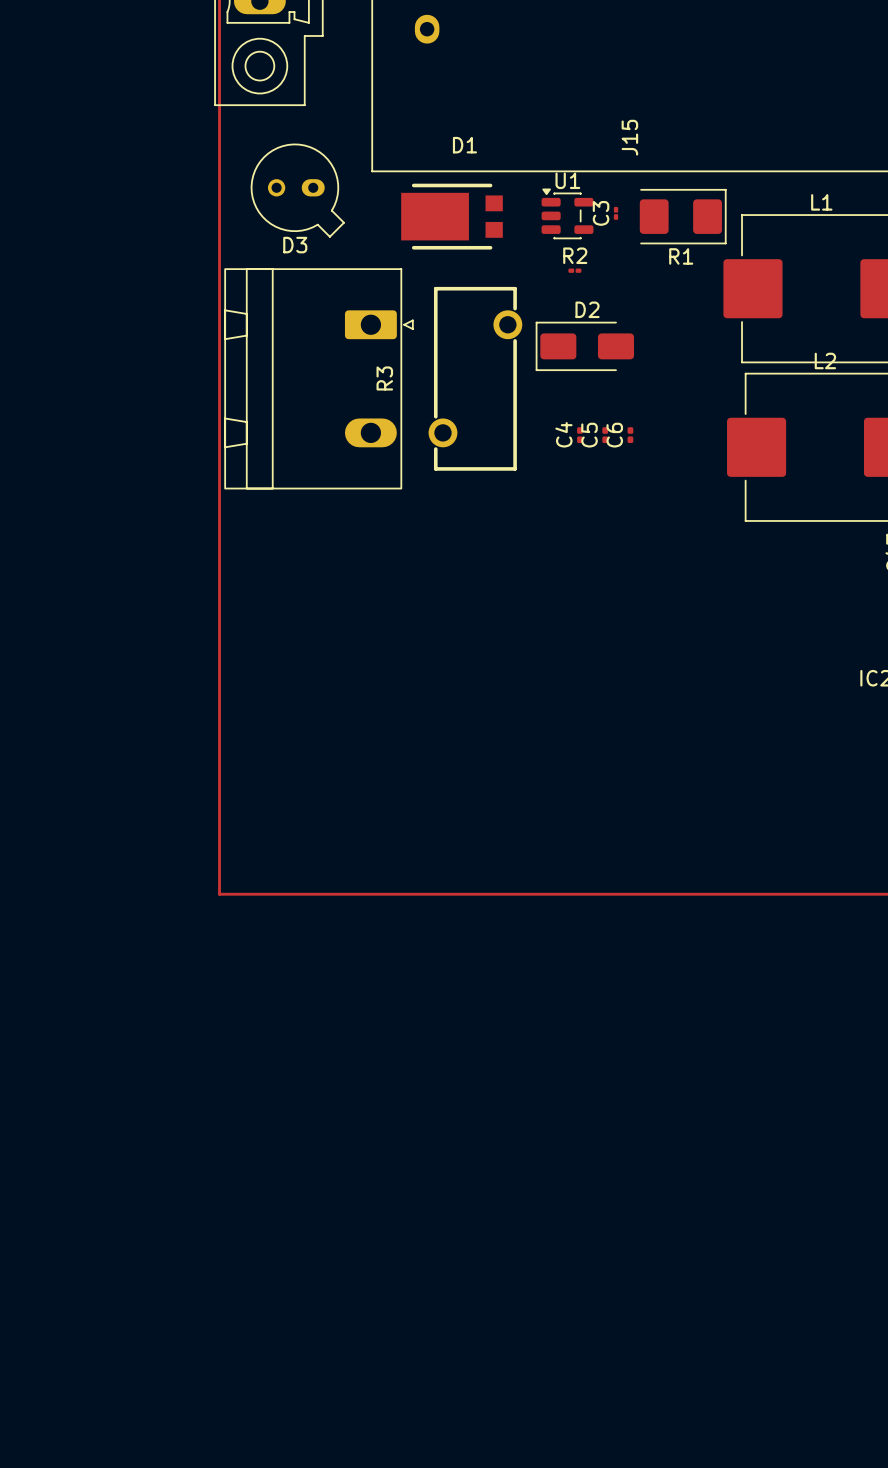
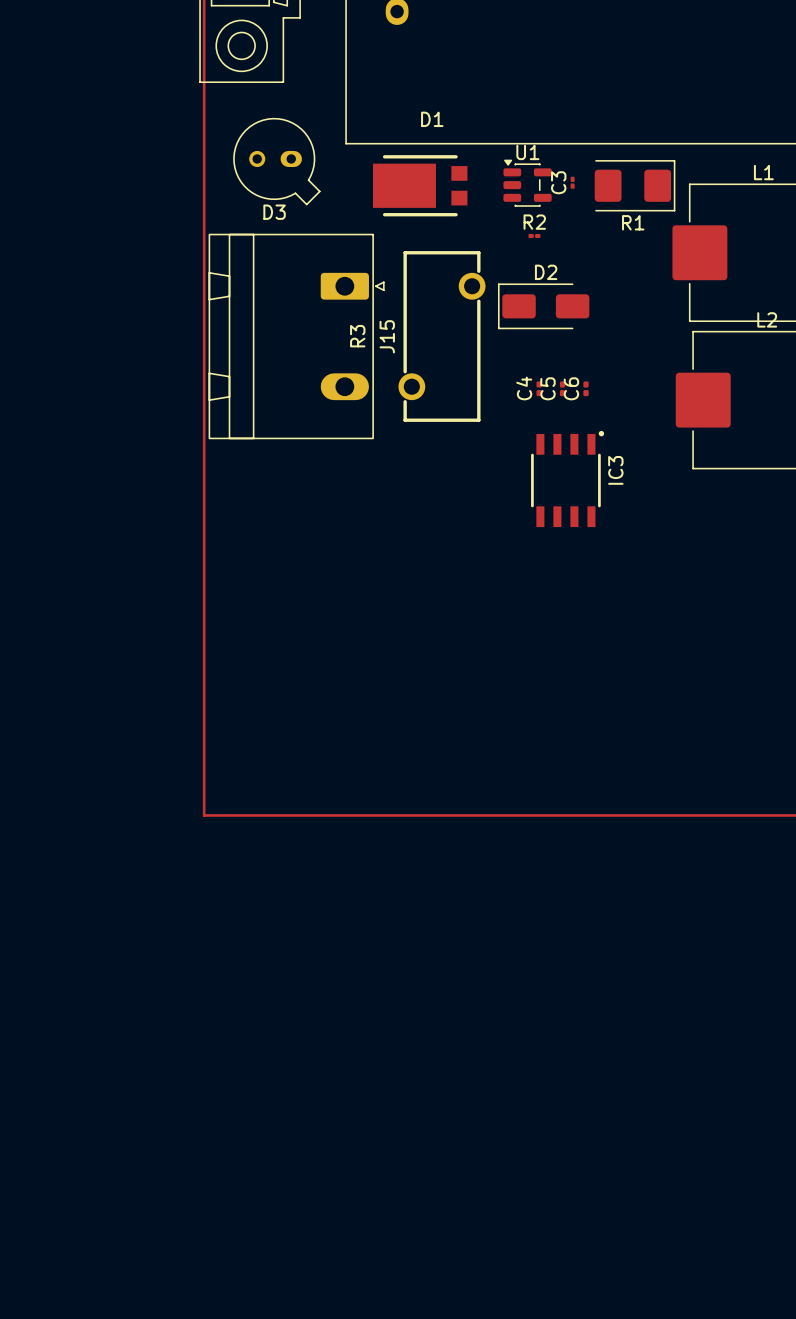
J15 name position: J15 (629, 137) -> J15 (387, 336)
IC3: none -> (567, 479)

